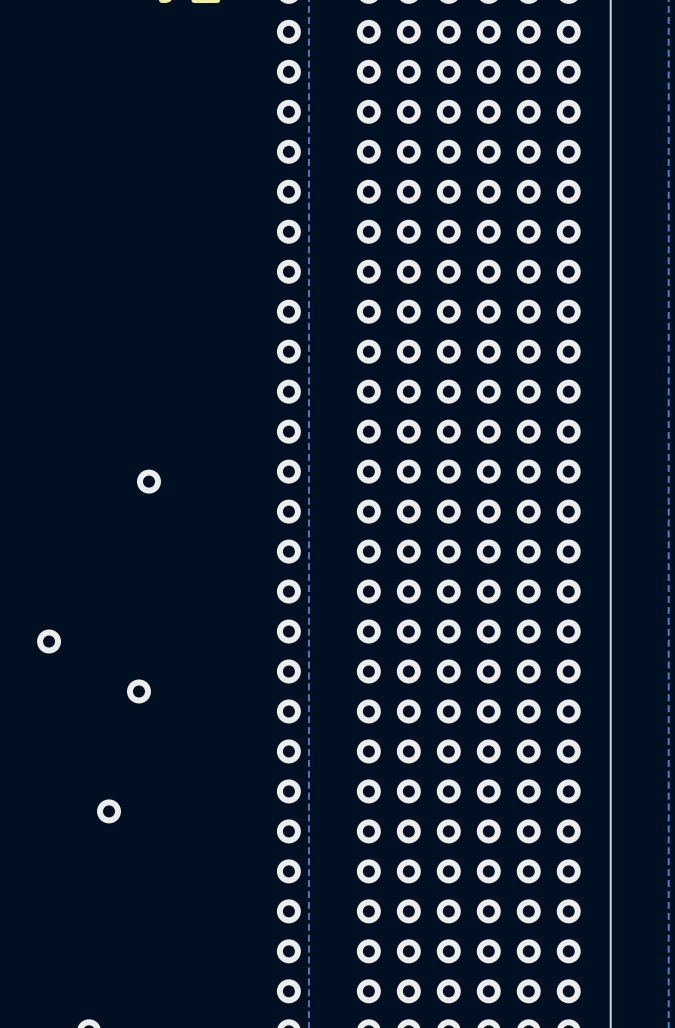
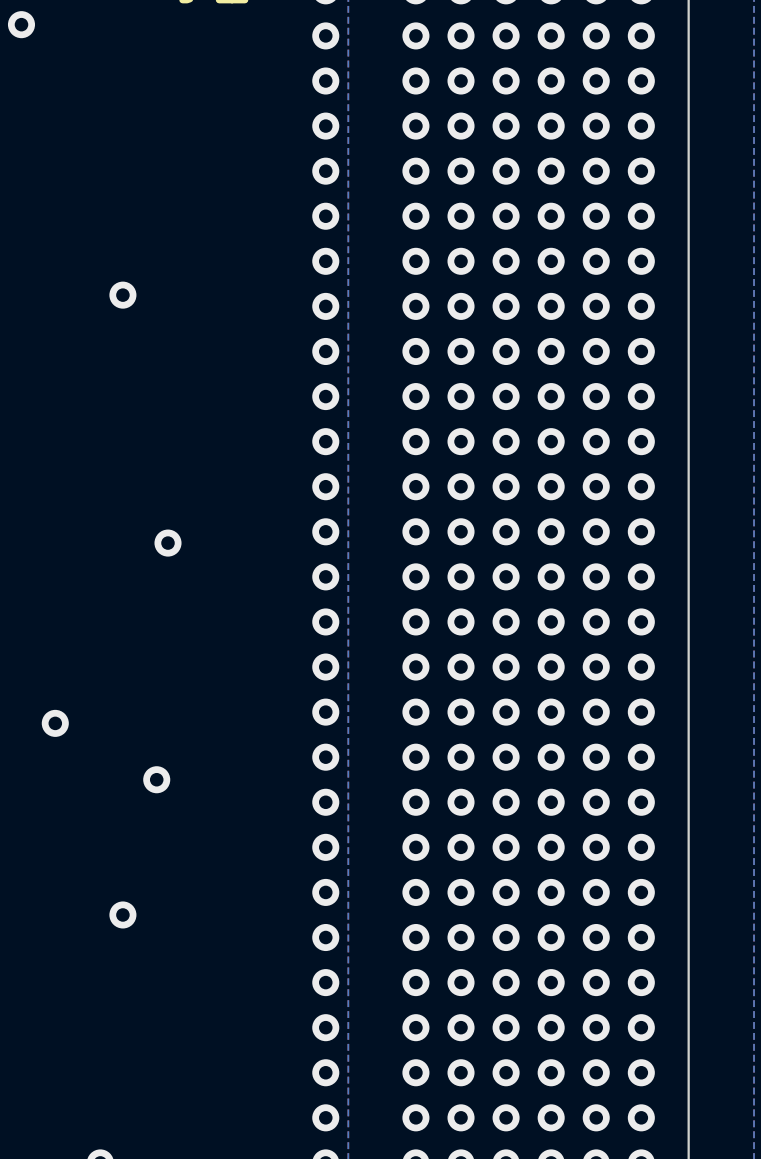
via: none -> (21, 24)
via: none -> (122, 295)

